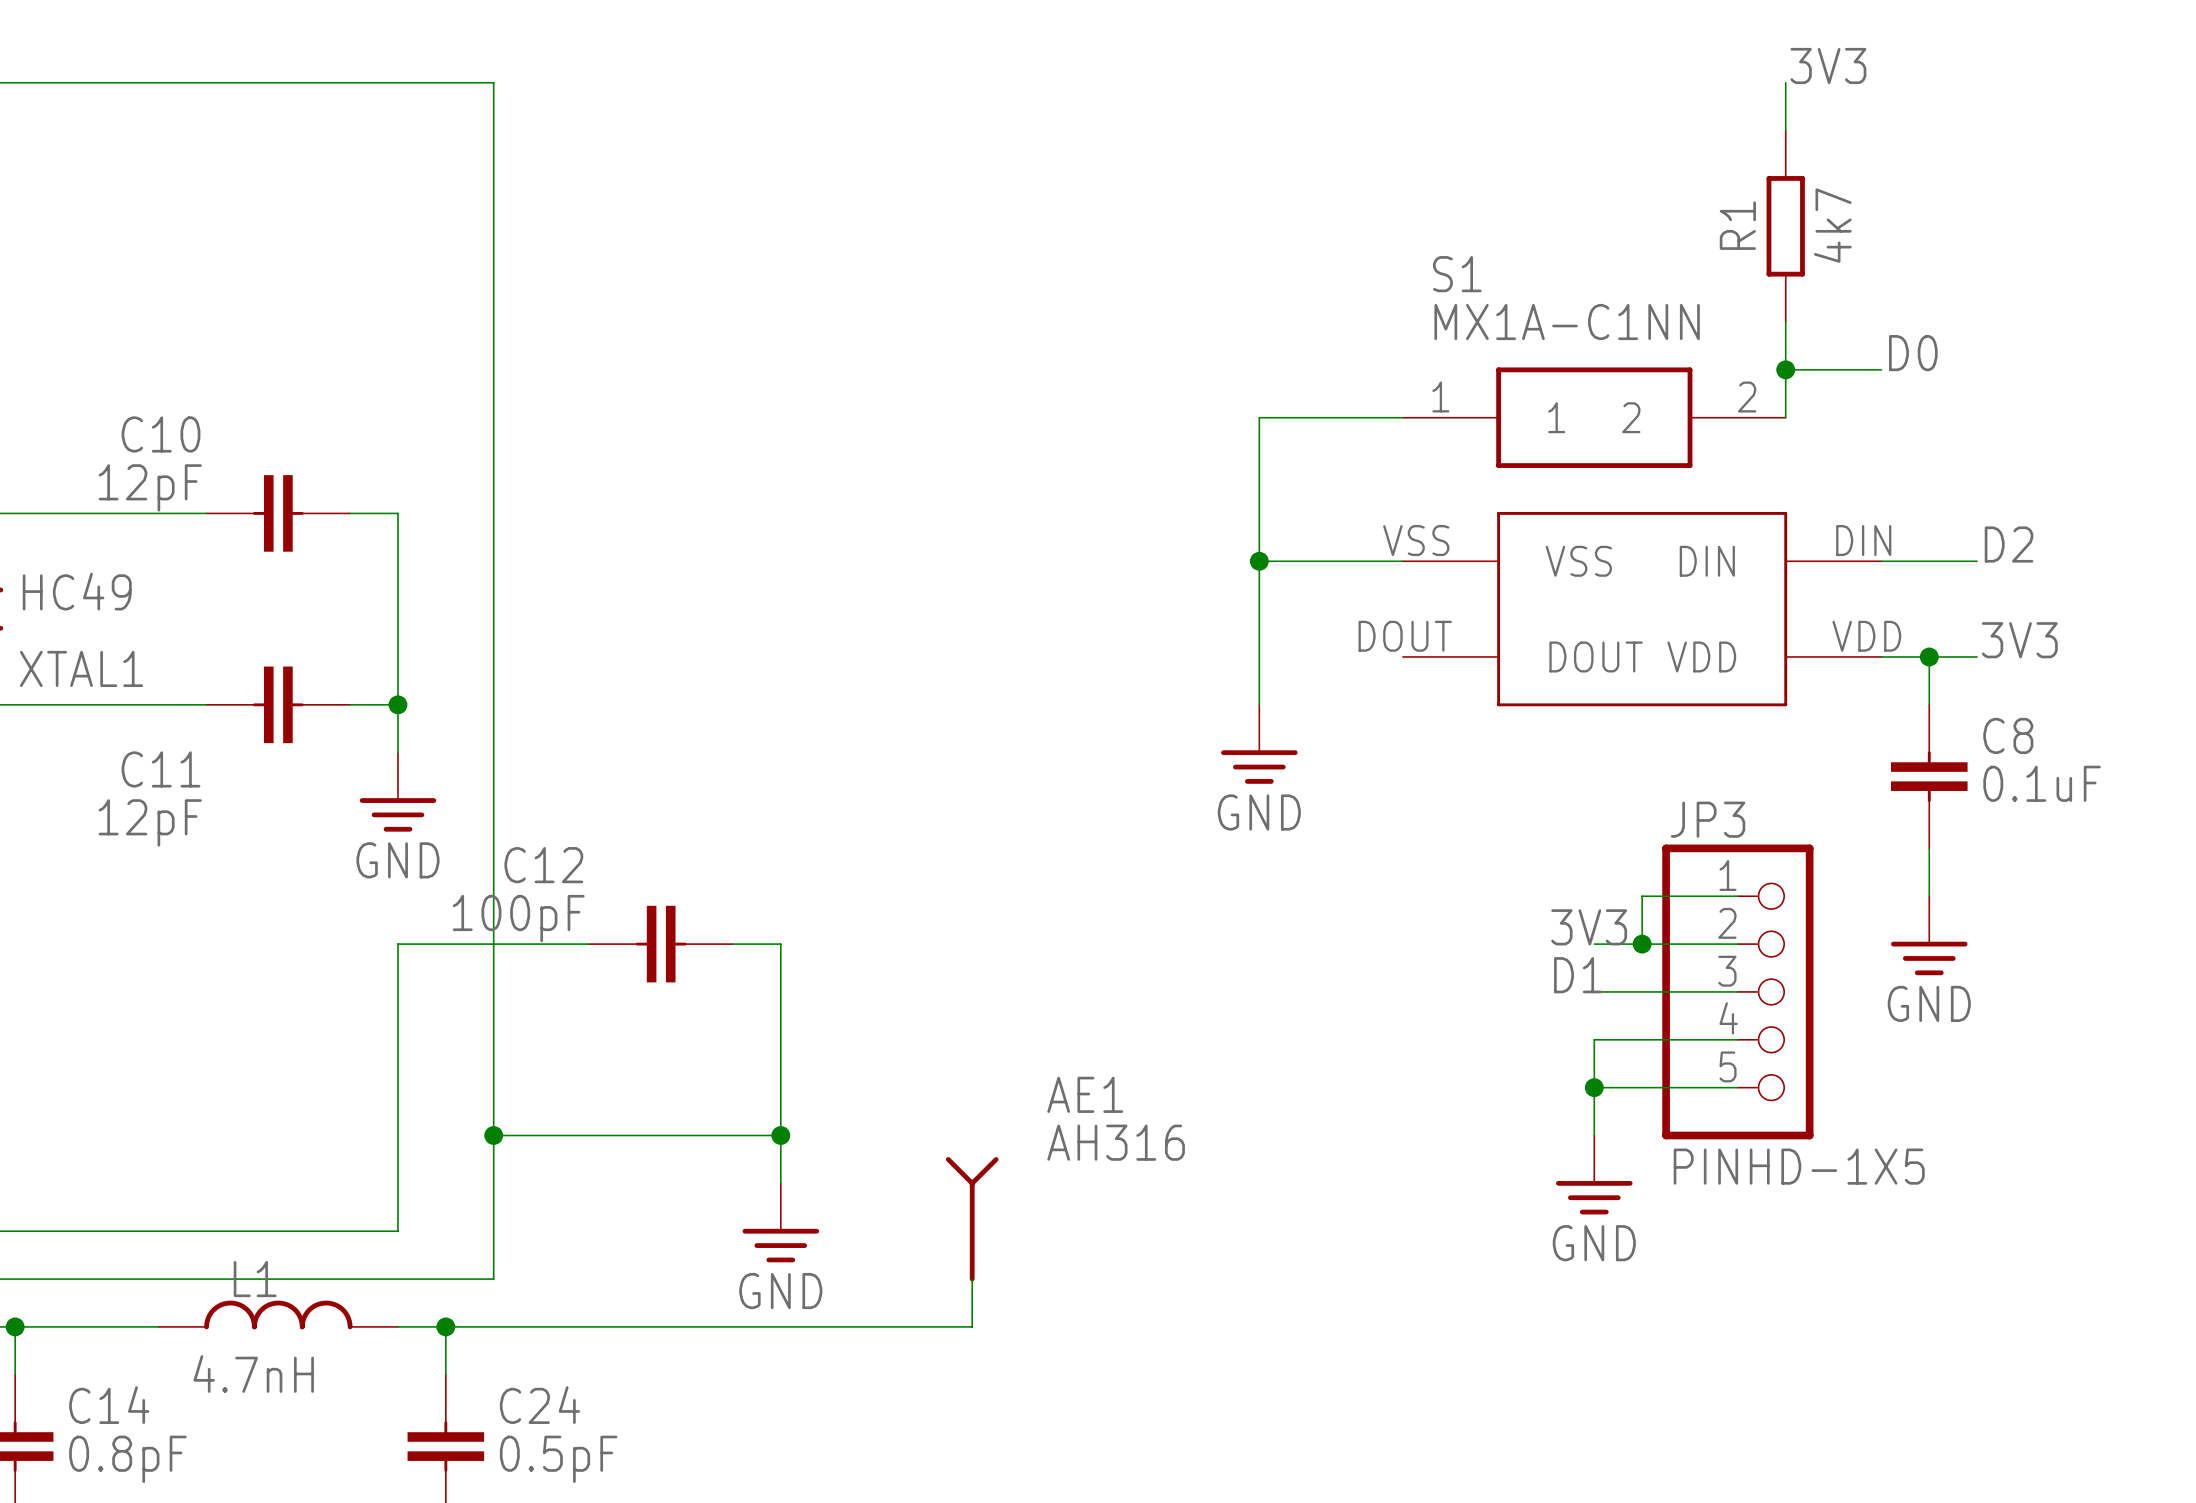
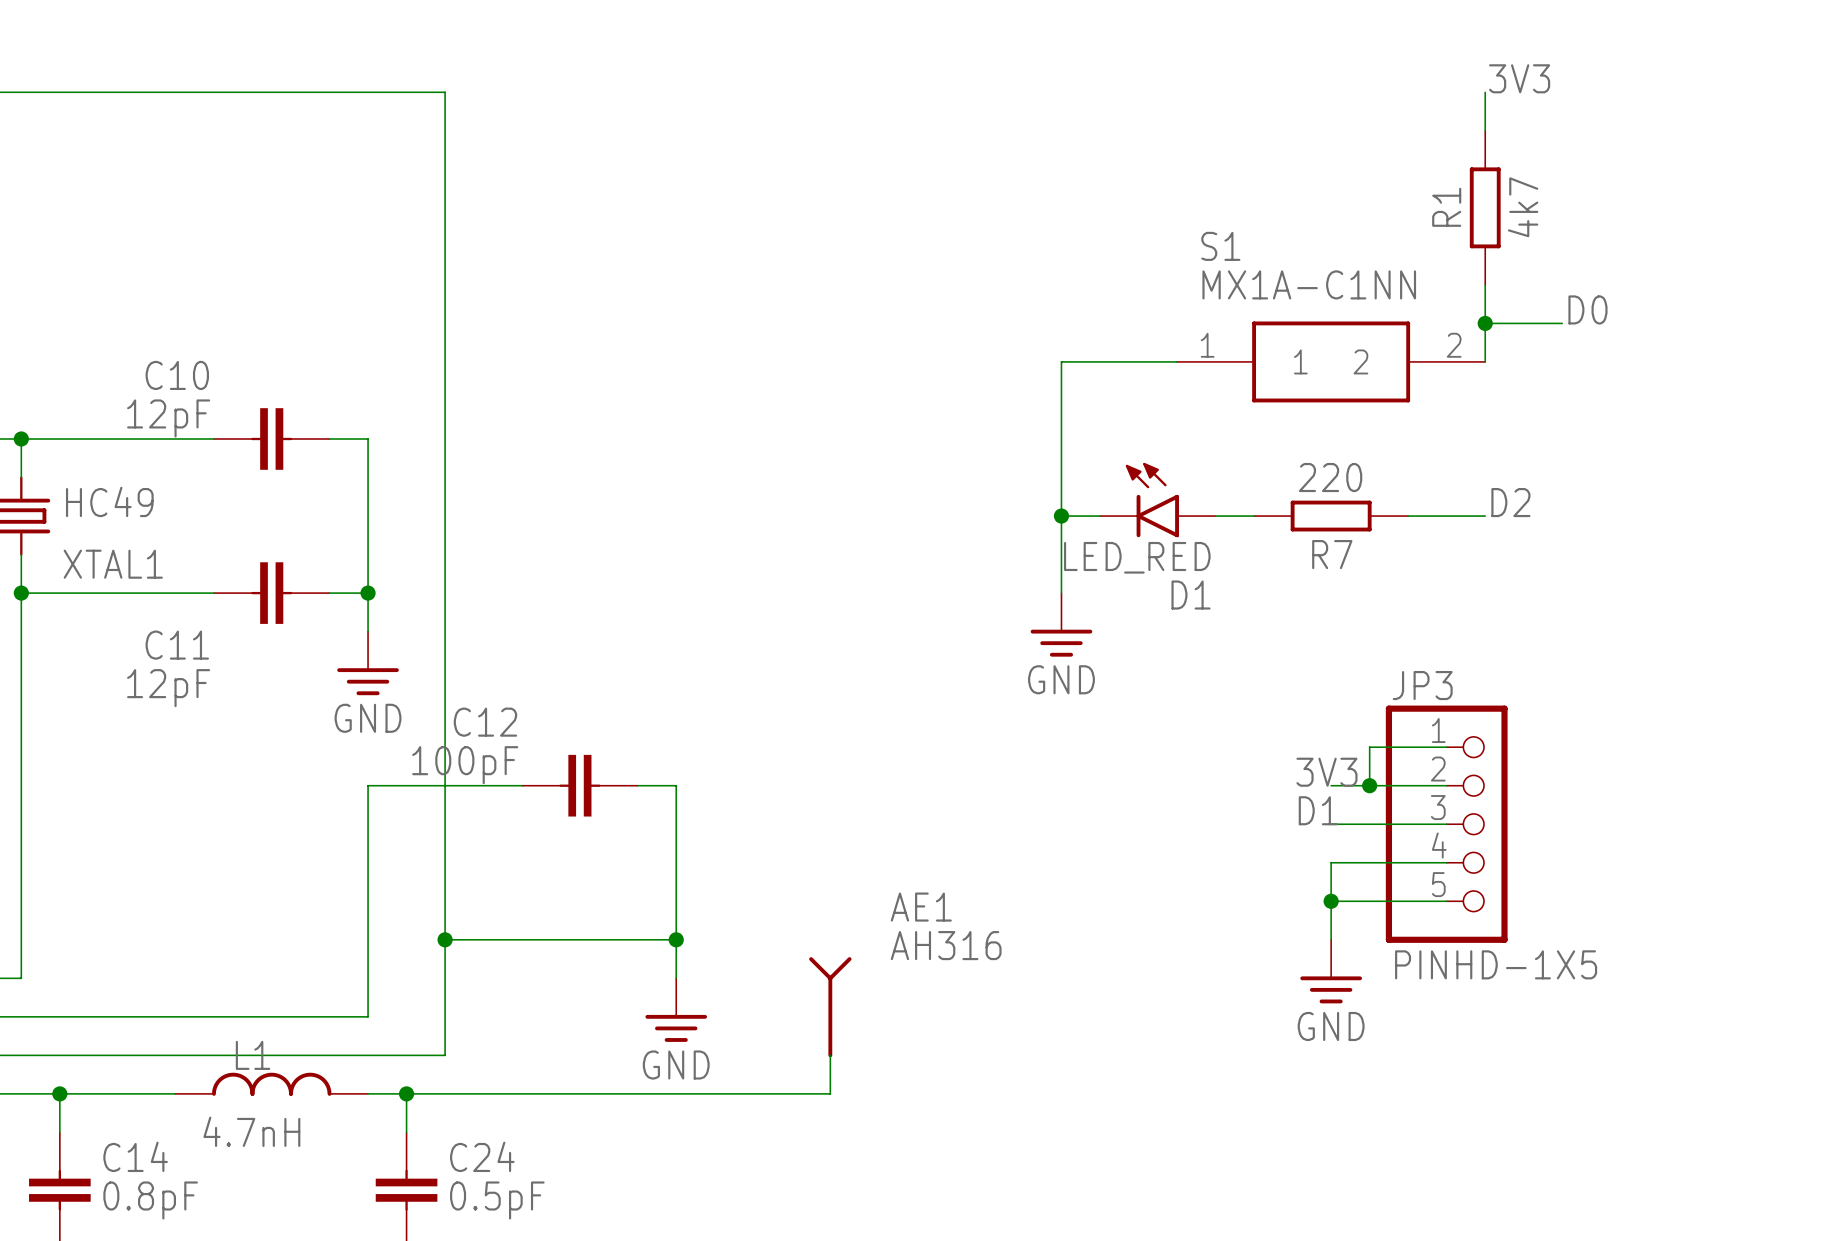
label position: D2 (2009, 544) -> D2 (1510, 502)
wire: (1259, 561) (1402, 561) -> none
junction position: (1259, 561) -> (1061, 516)
wire: (1881, 561) (1977, 561) -> (1408, 516) (1485, 516)
D1: none -> LED_RED (1157, 500)
wire: none -> (1061, 516) (1099, 516)
wire: none -> (1215, 516) (1254, 516)
R7: none -> 220 (1331, 516)
part: (1642, 609) -> none
label: 3V3 (2019, 640) -> none
wire: (1881, 656) (1977, 656) -> none
wire: (1929, 656) (1929, 704) -> none
junction: (1929, 656) -> none
C8: 0.1uF (1929, 776) -> none
wire: (1929, 848) (1929, 896) -> none
power symbol: GND (1929, 935) -> none

